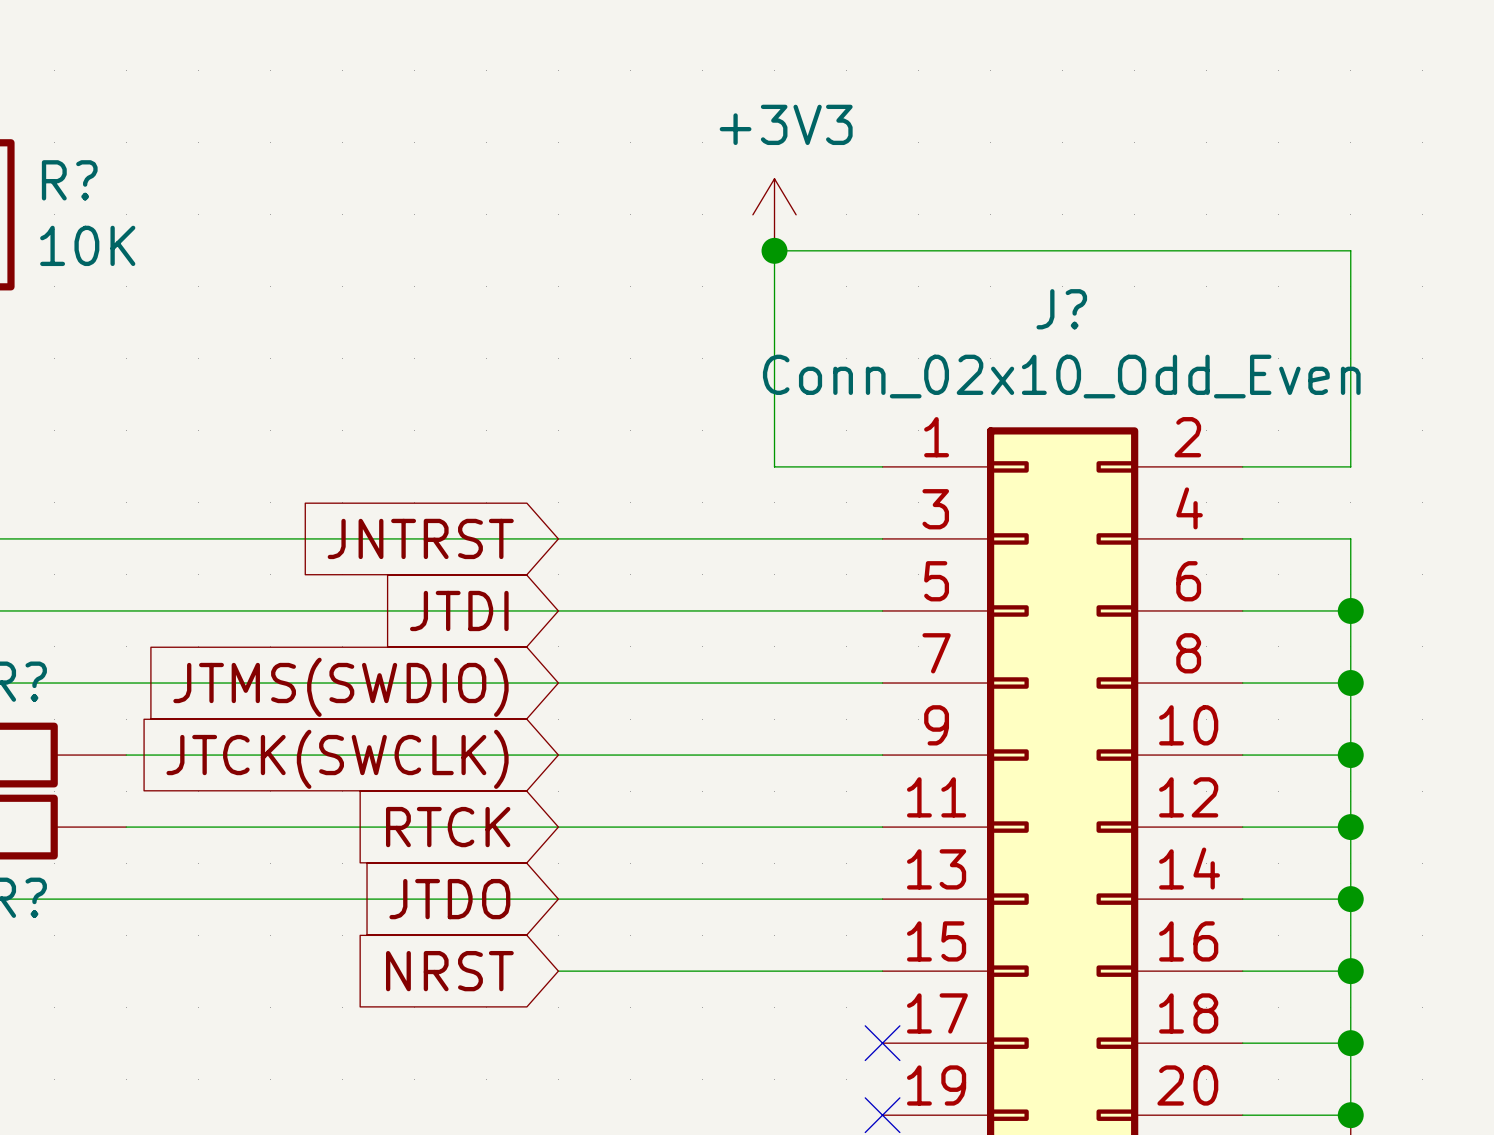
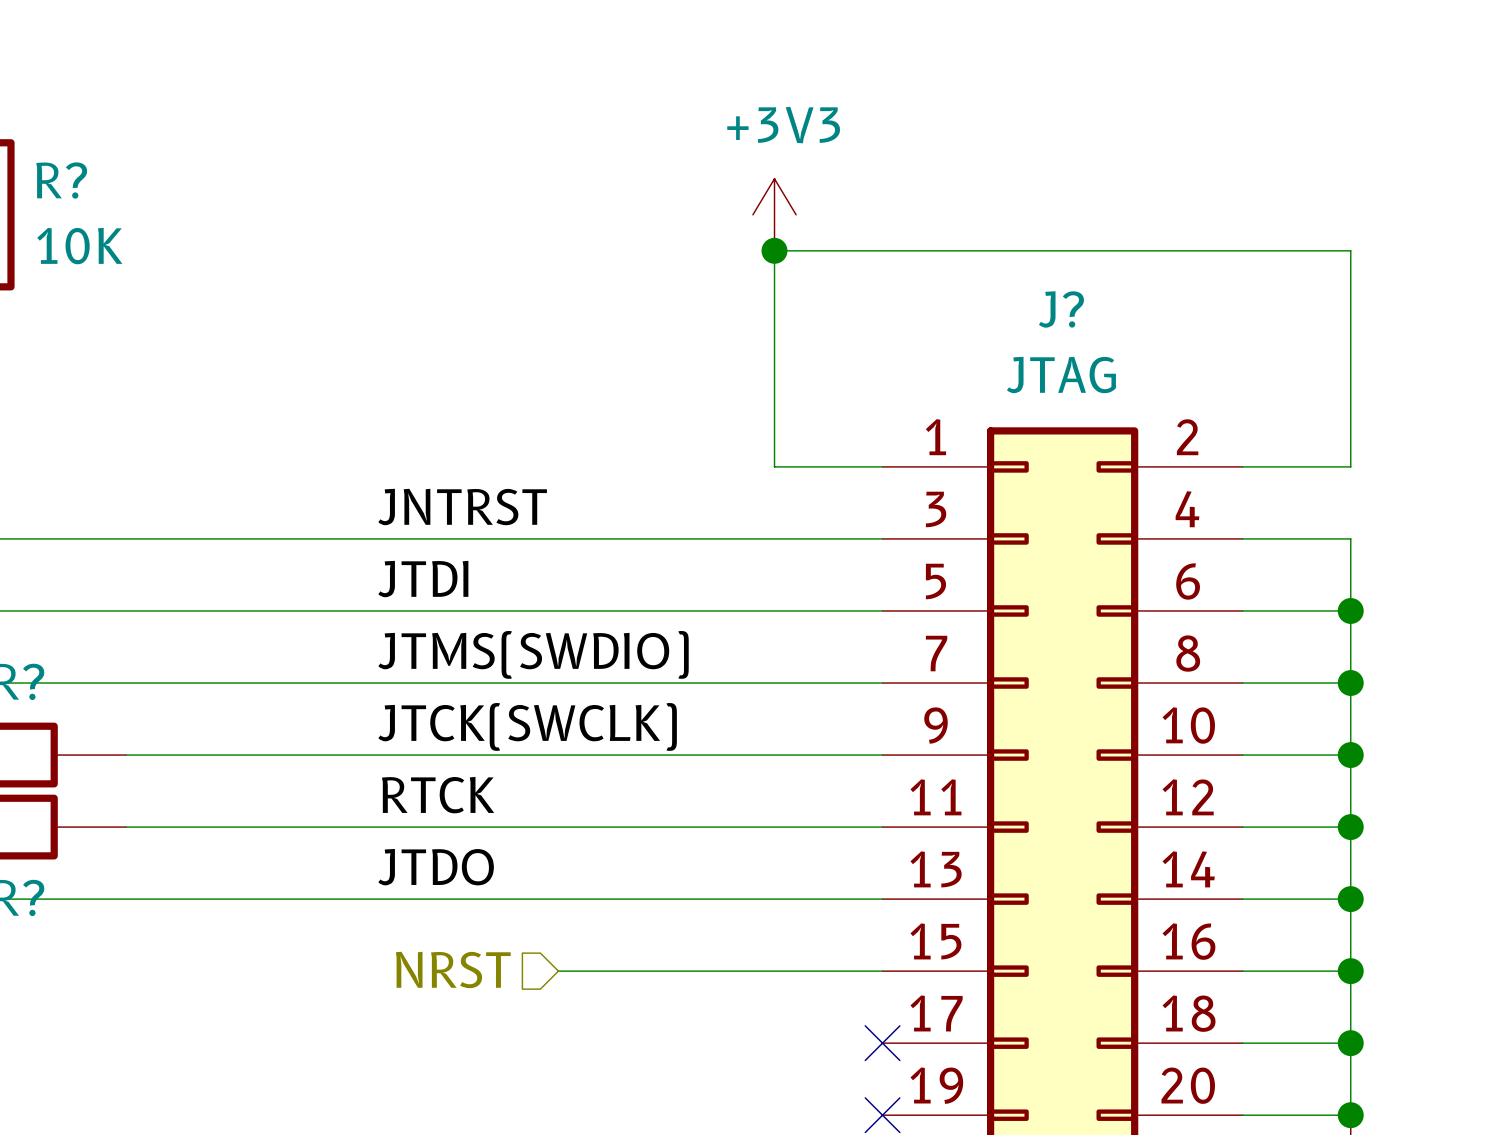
J? value: Conn_02x10_Odd_Even (1061, 376) -> JTAG (1061, 375)
label: none -> JNTRST (462, 507)
global label: JNTRST (420, 538) -> none
label: none -> JTDI (423, 579)
global label: JTDI (459, 610) -> none
label: none -> JTMS(SWDIO) (533, 654)
global label: JTMS(SWDIO) (340, 687) -> none
label: none -> JTCK(SWCLK) (527, 726)
global label: JTCK(SWCLK) (337, 759) -> none
label: none -> RTCK (438, 795)
global label: RTCK (448, 827) -> none
label: none -> JTDO (436, 867)
global label: JTDO (449, 899) -> none
hierarchical label: none -> NRST (453, 969)
global label: NRST (449, 971) -> none

